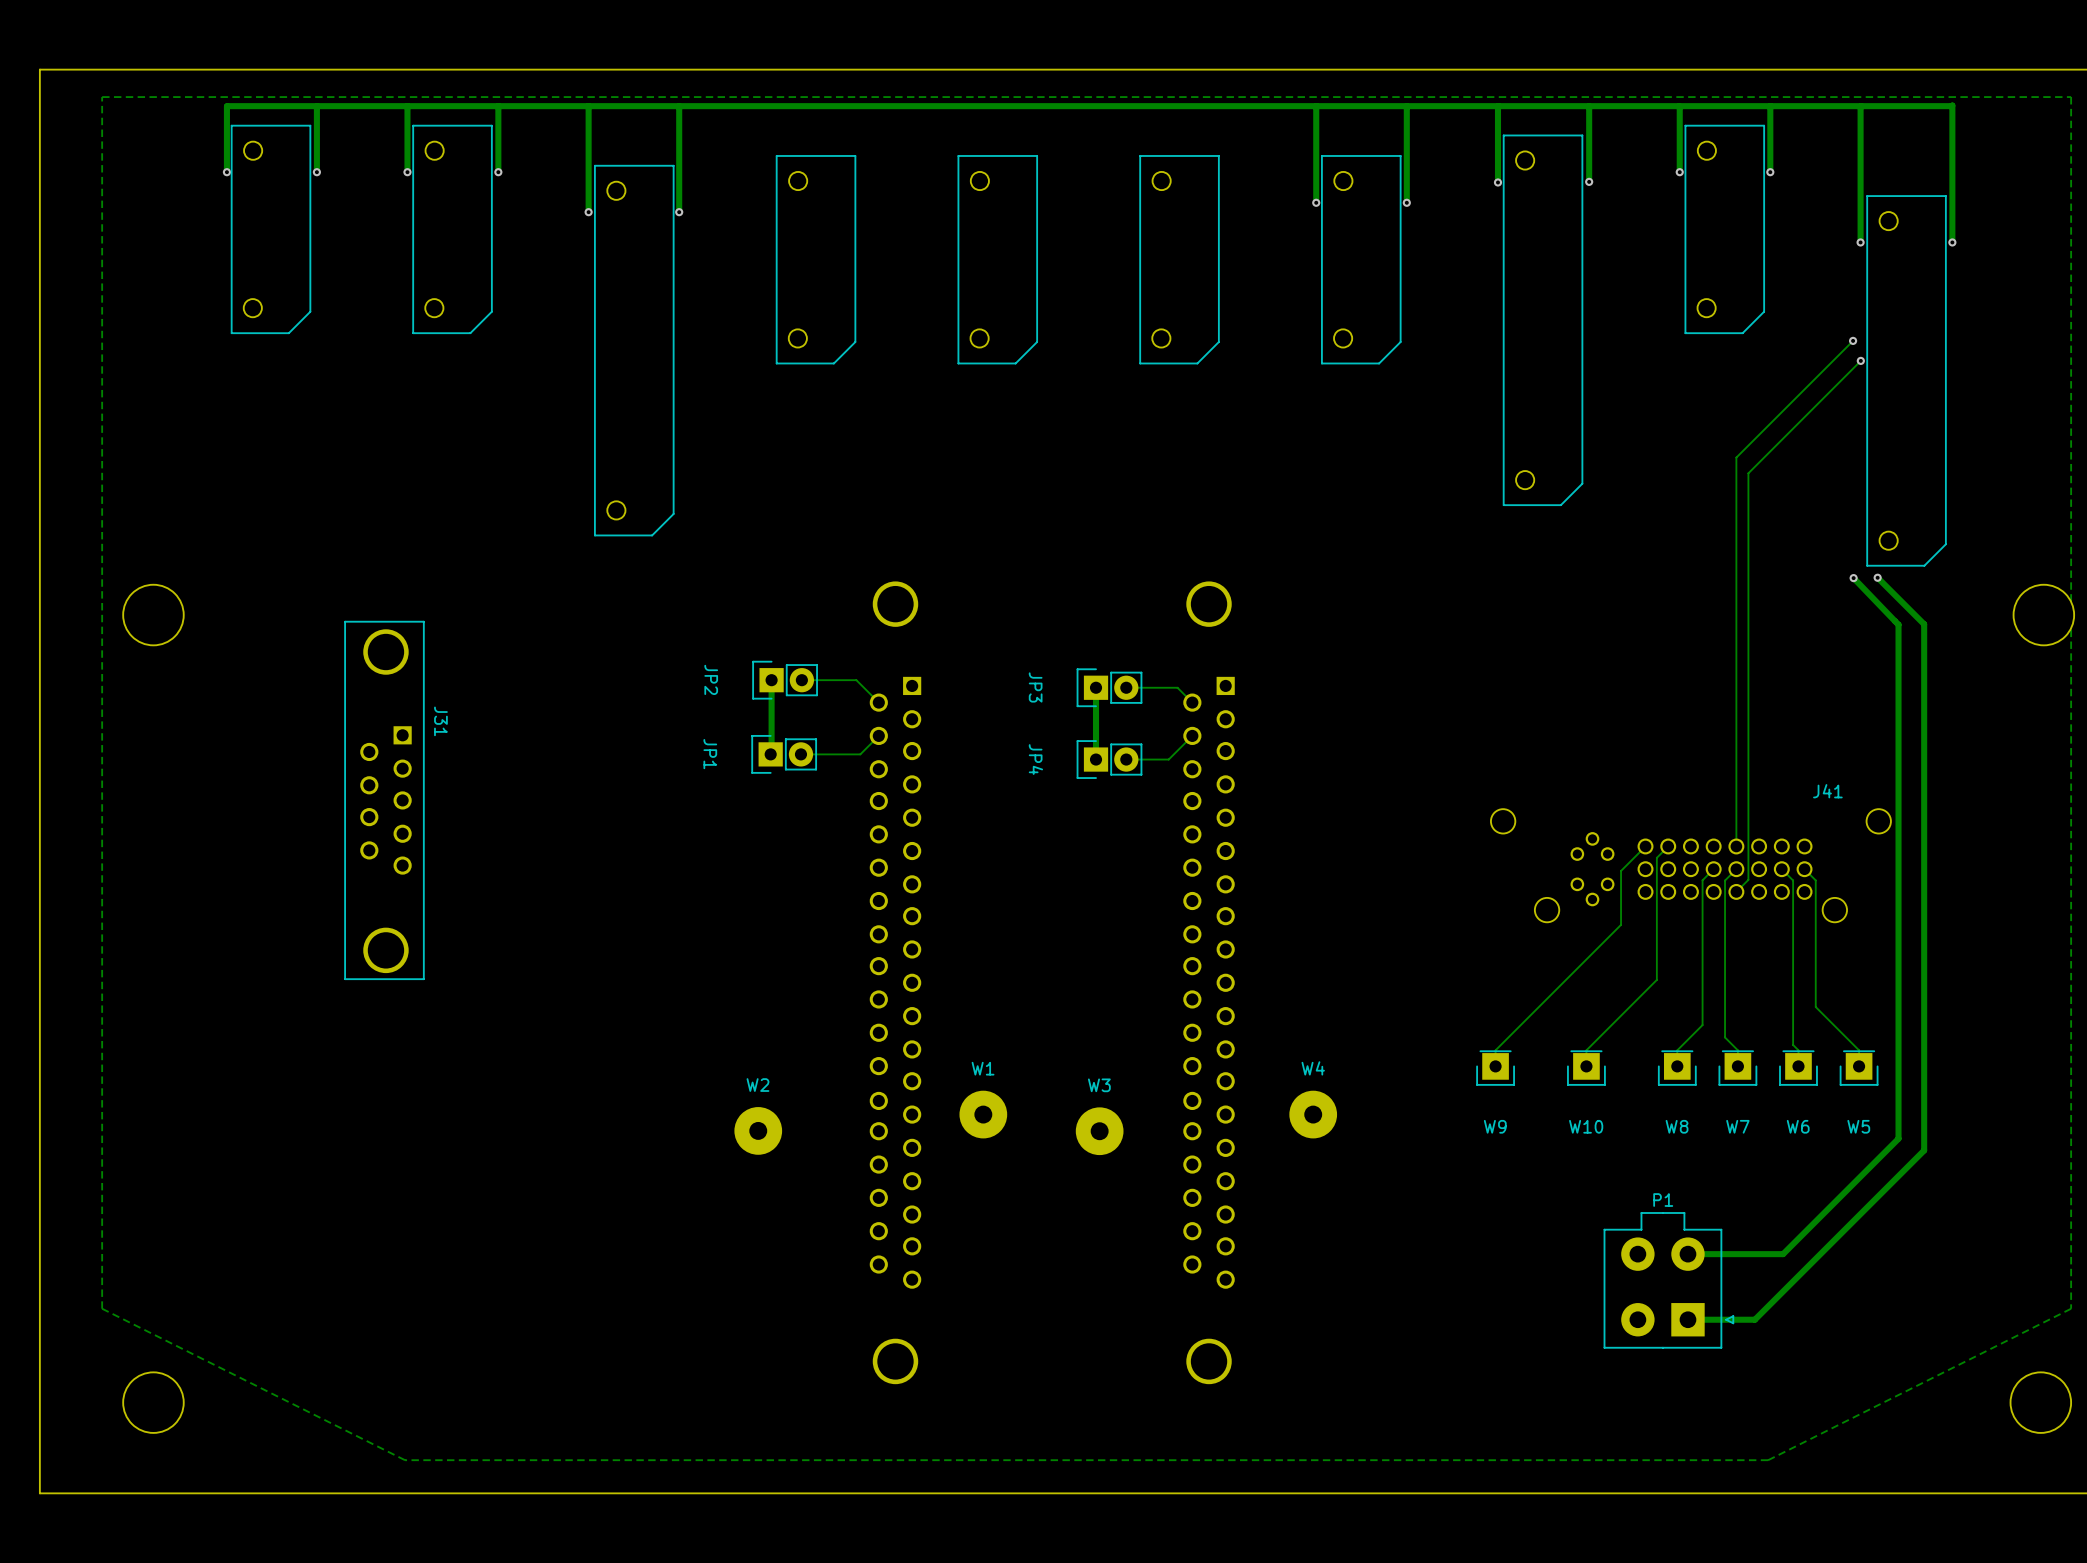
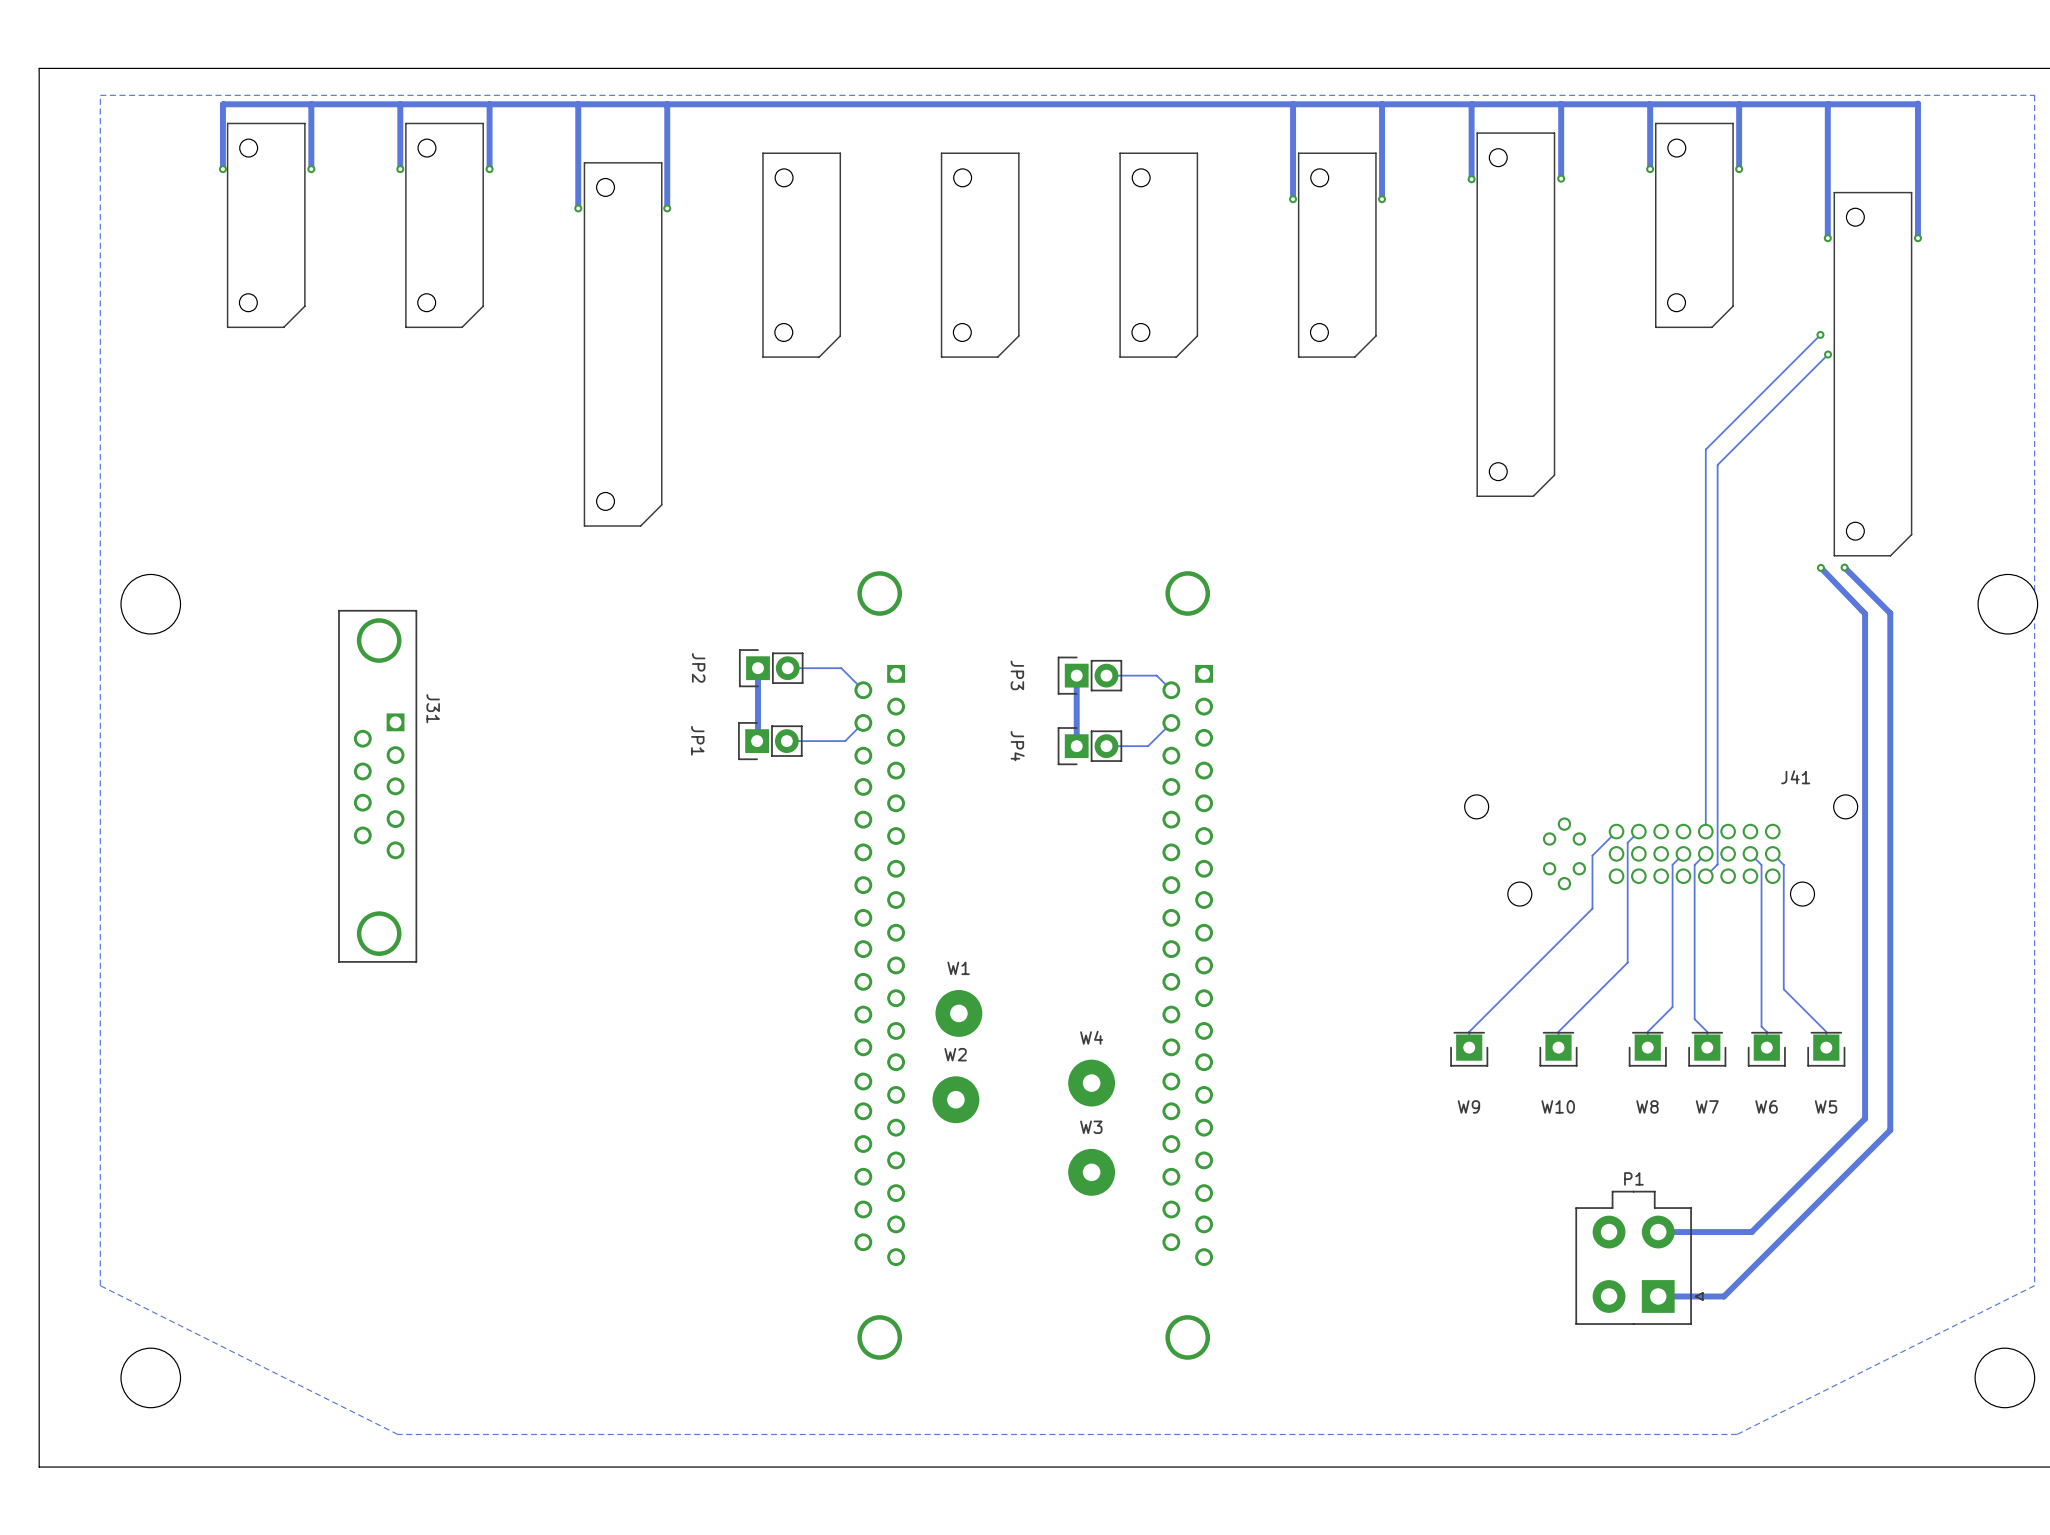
W1 position: (983, 1114) -> (958, 1013)
W4 position: (1313, 1114) -> (1091, 1083)
W2 position: (758, 1130) -> (955, 1099)
W3 position: (1099, 1131) -> (1091, 1172)

